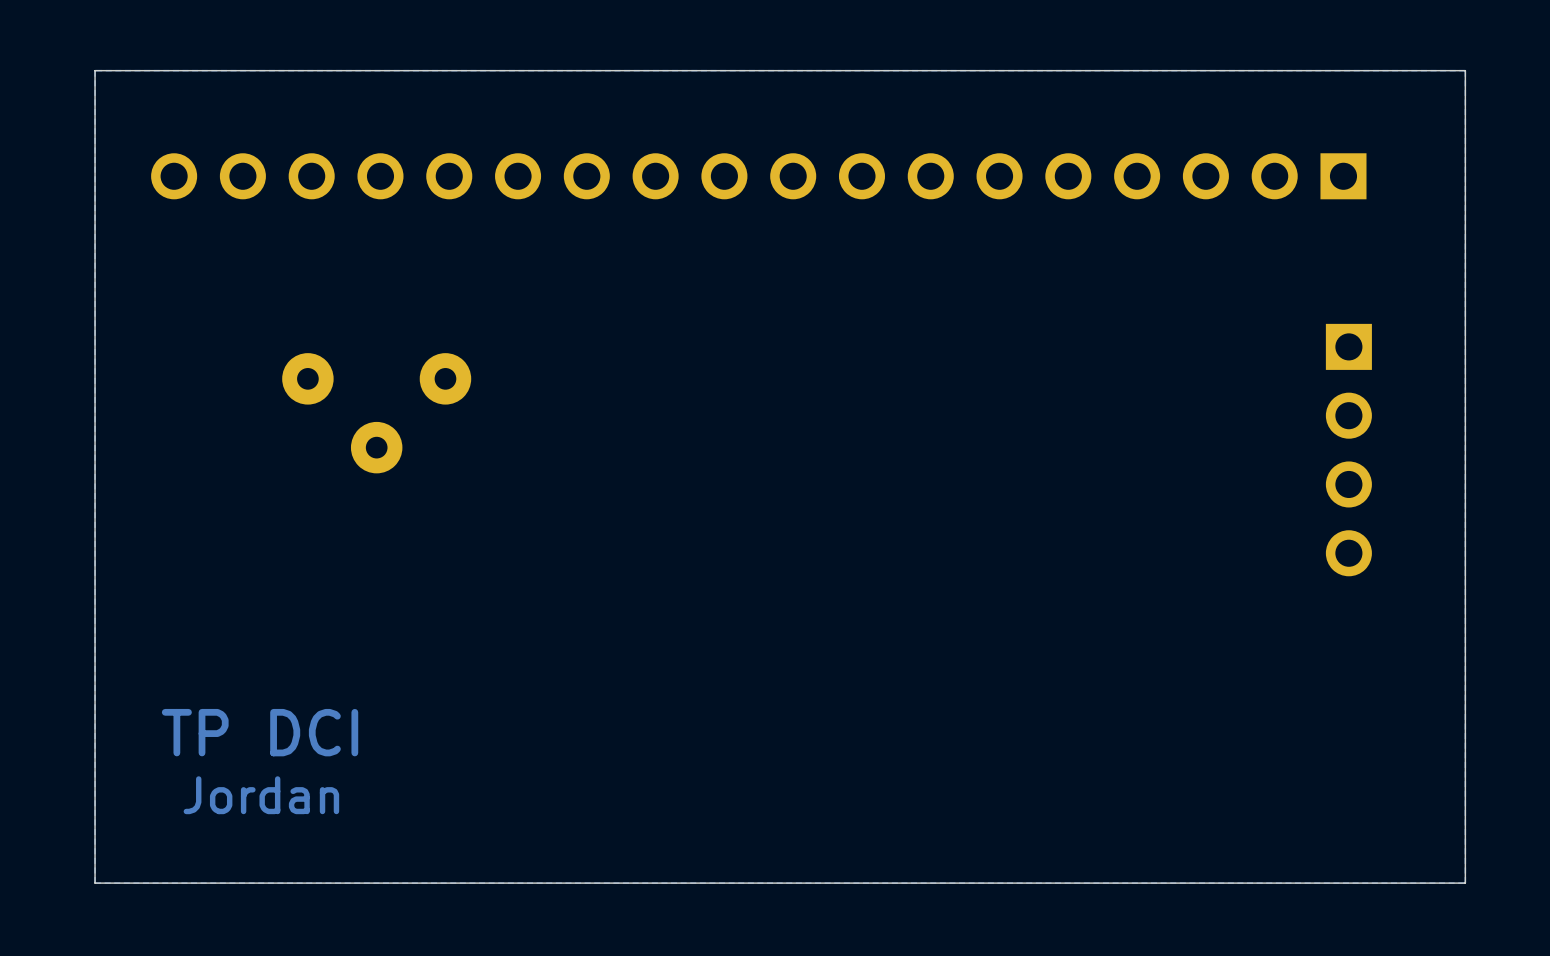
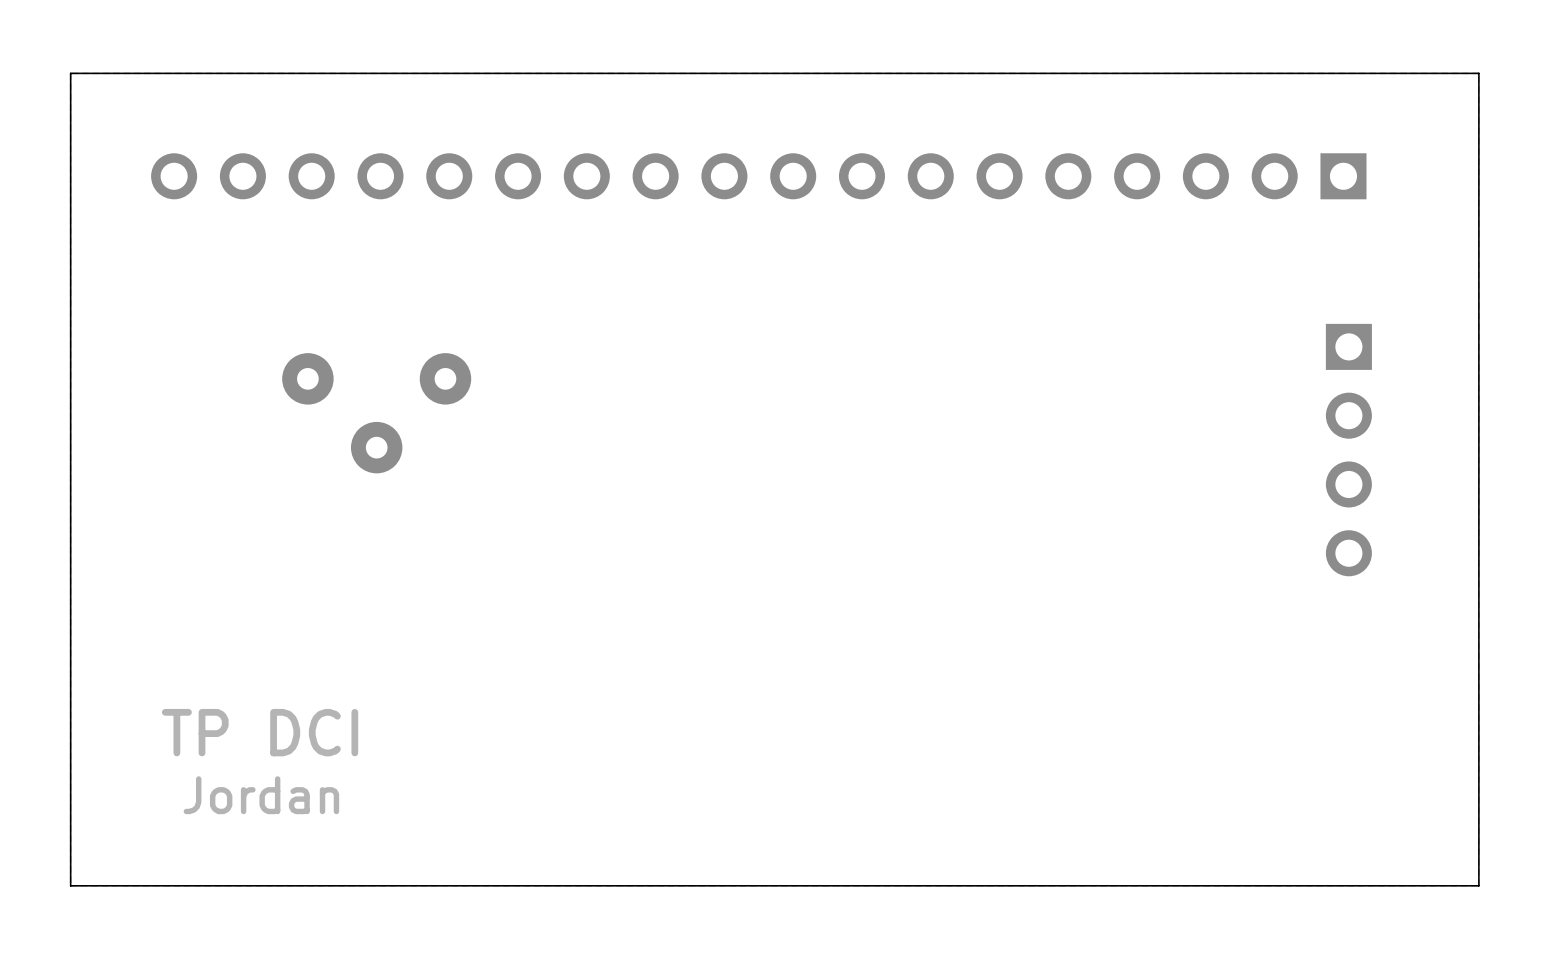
board edge: (1465, 70) (1465, 883) (95, 883) (95, 70) (1465, 70) -> (1478, 73) (1478, 885) (70, 885) (70, 73) (1478, 73)

